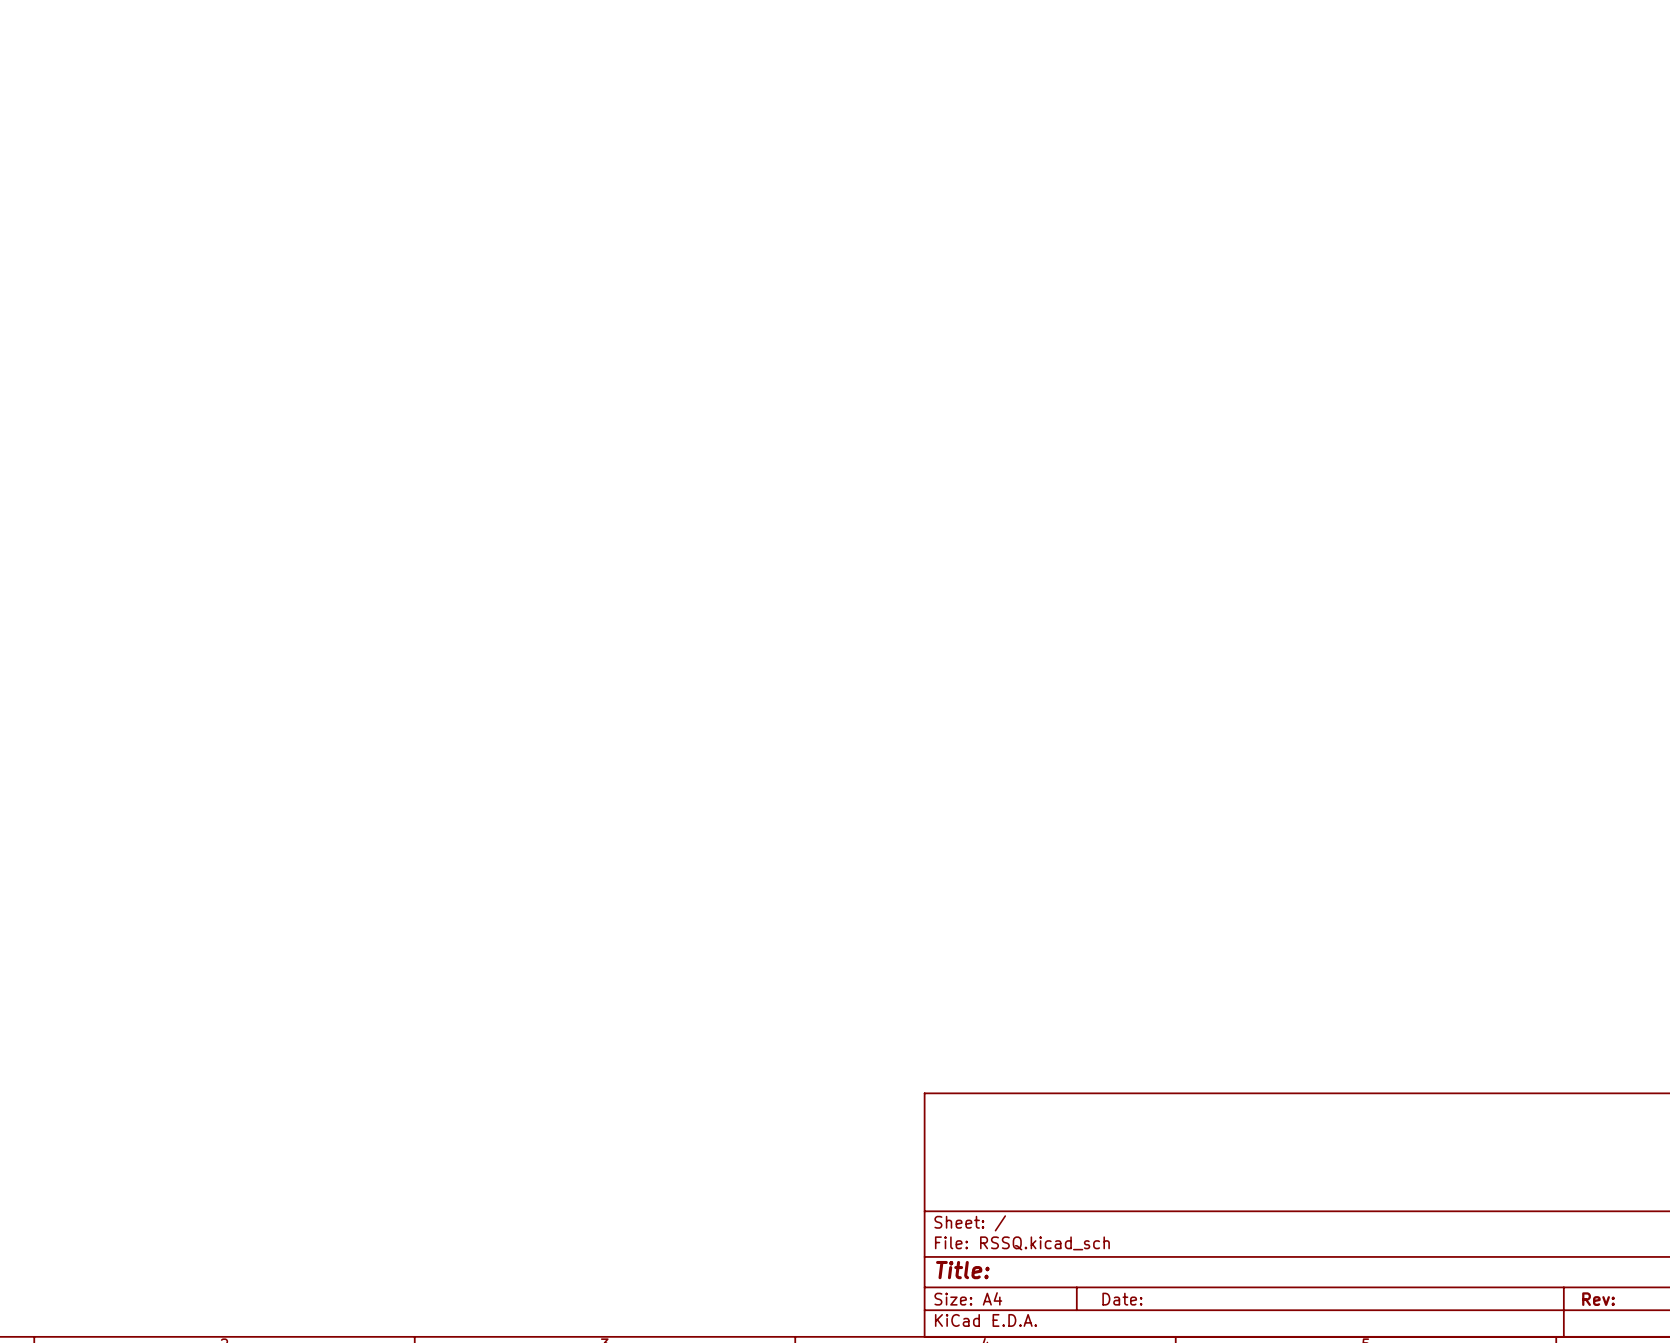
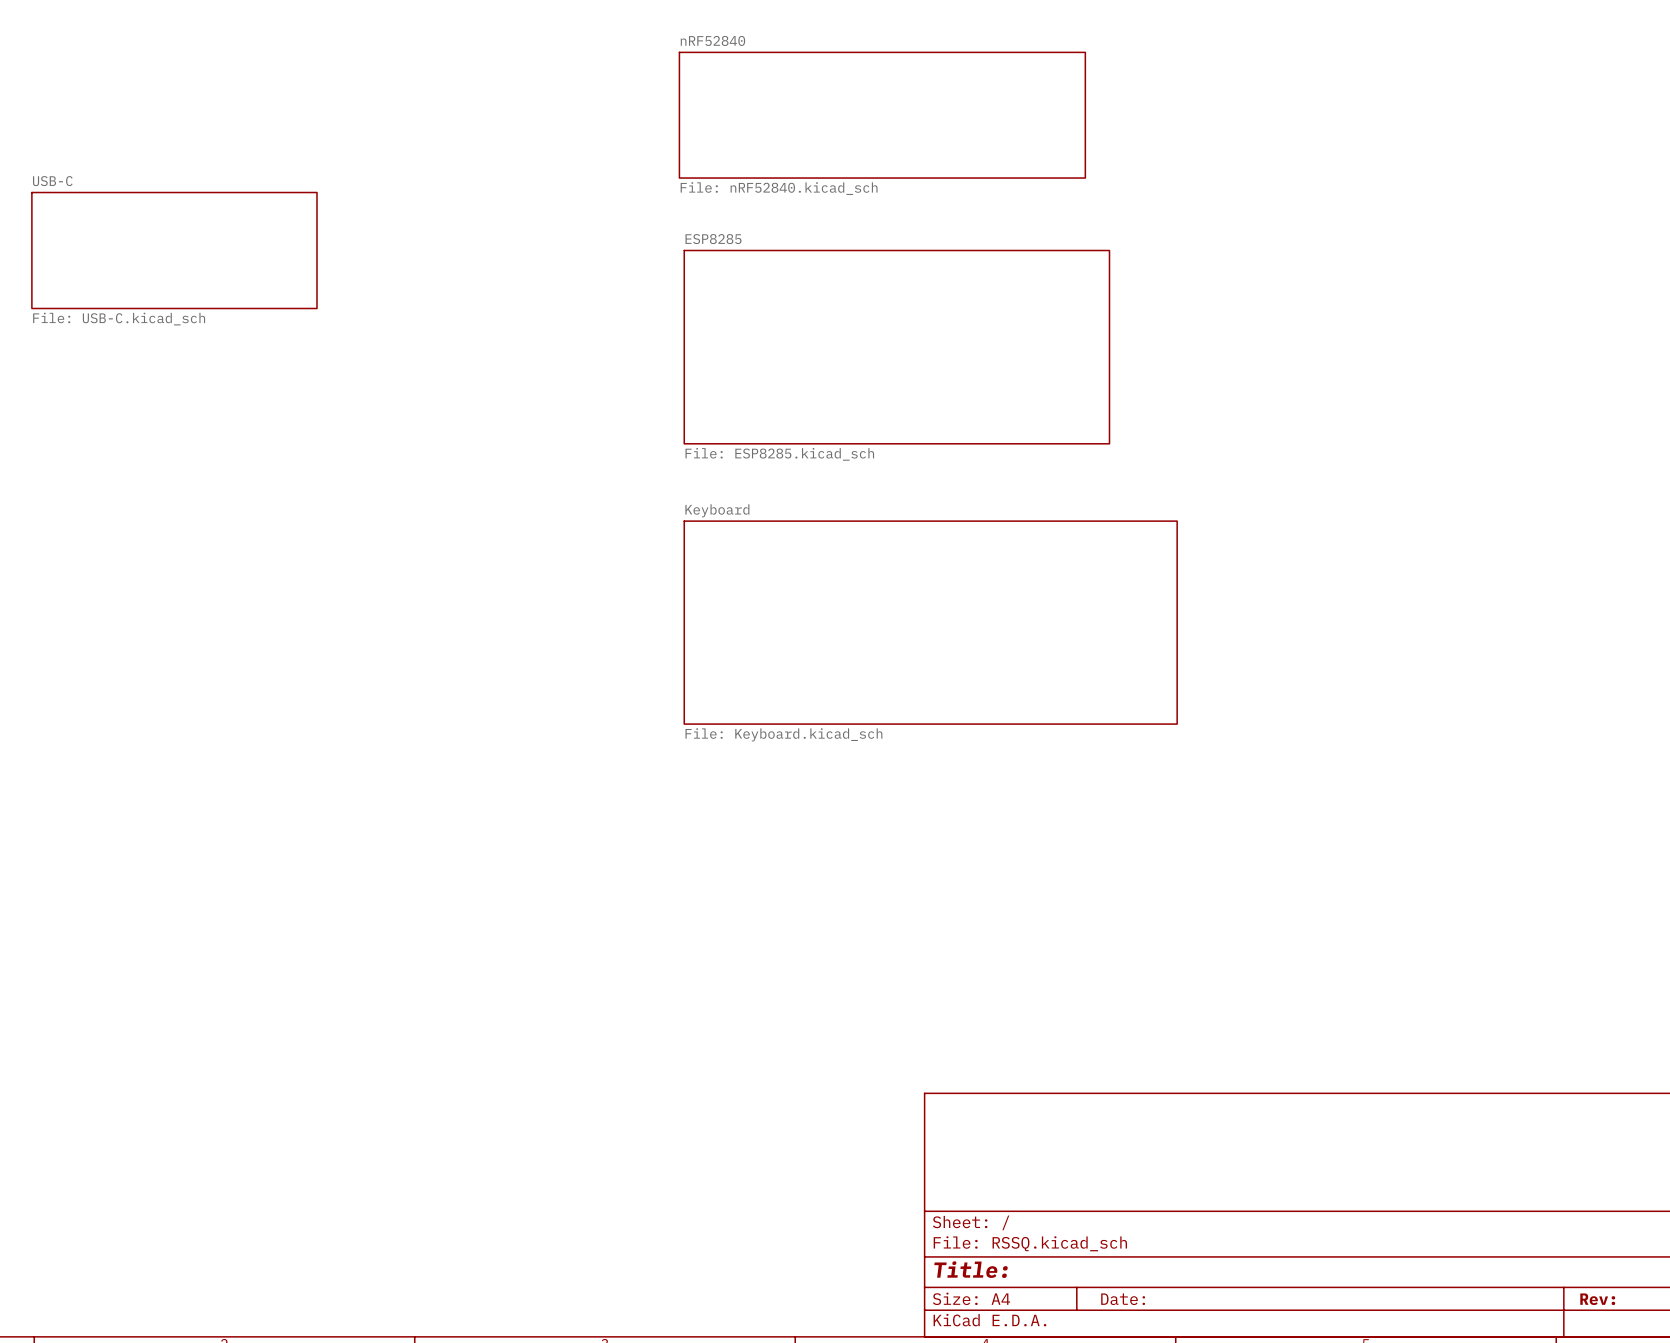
sheet nRF52840: none -> File: nRF52840.kicad_sch (882, 115)
sheet USB-C: none -> File: USB-C.kicad_sch (174, 250)
sheet ESP8285: none -> File: ESP8285.kicad_sch (896, 347)
sheet Keyboard: none -> File: Keyboard.kicad_sch (930, 622)

